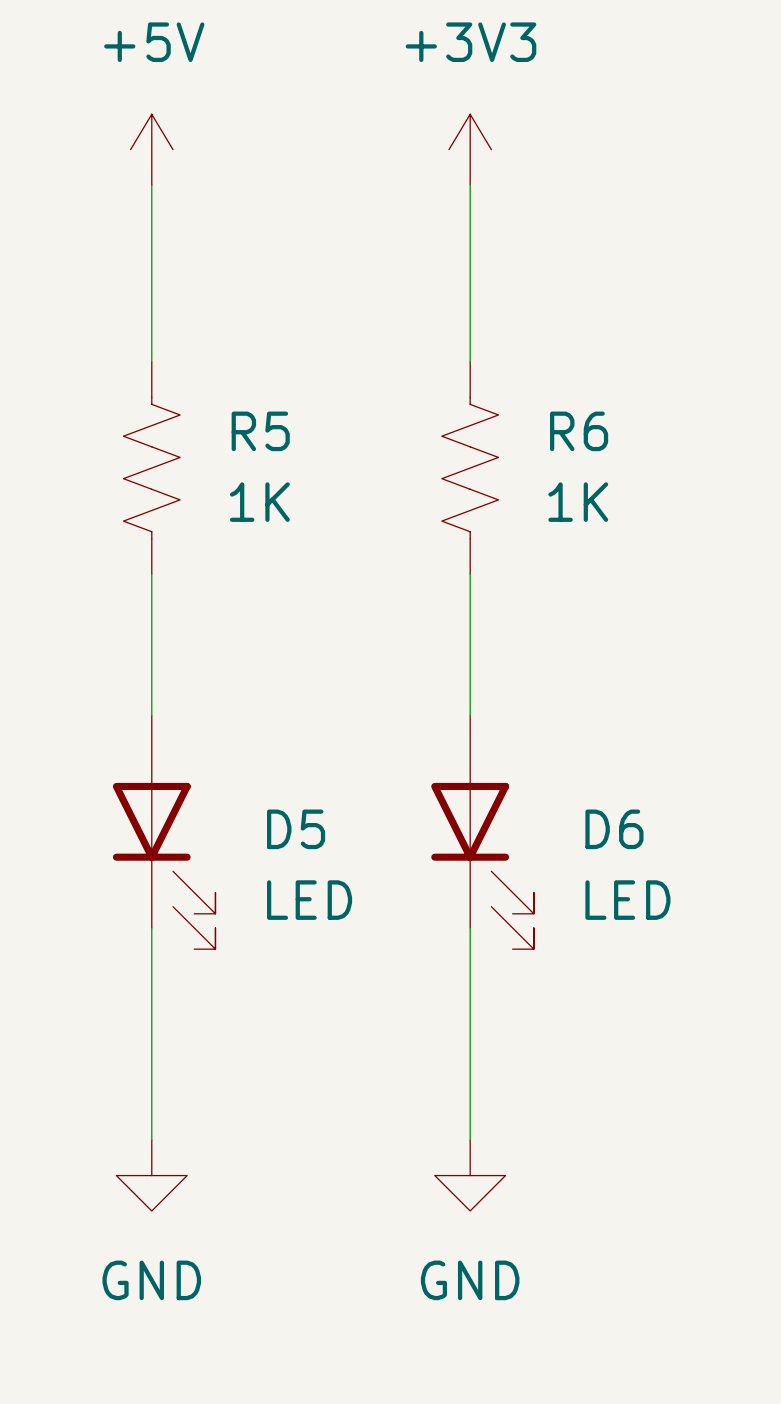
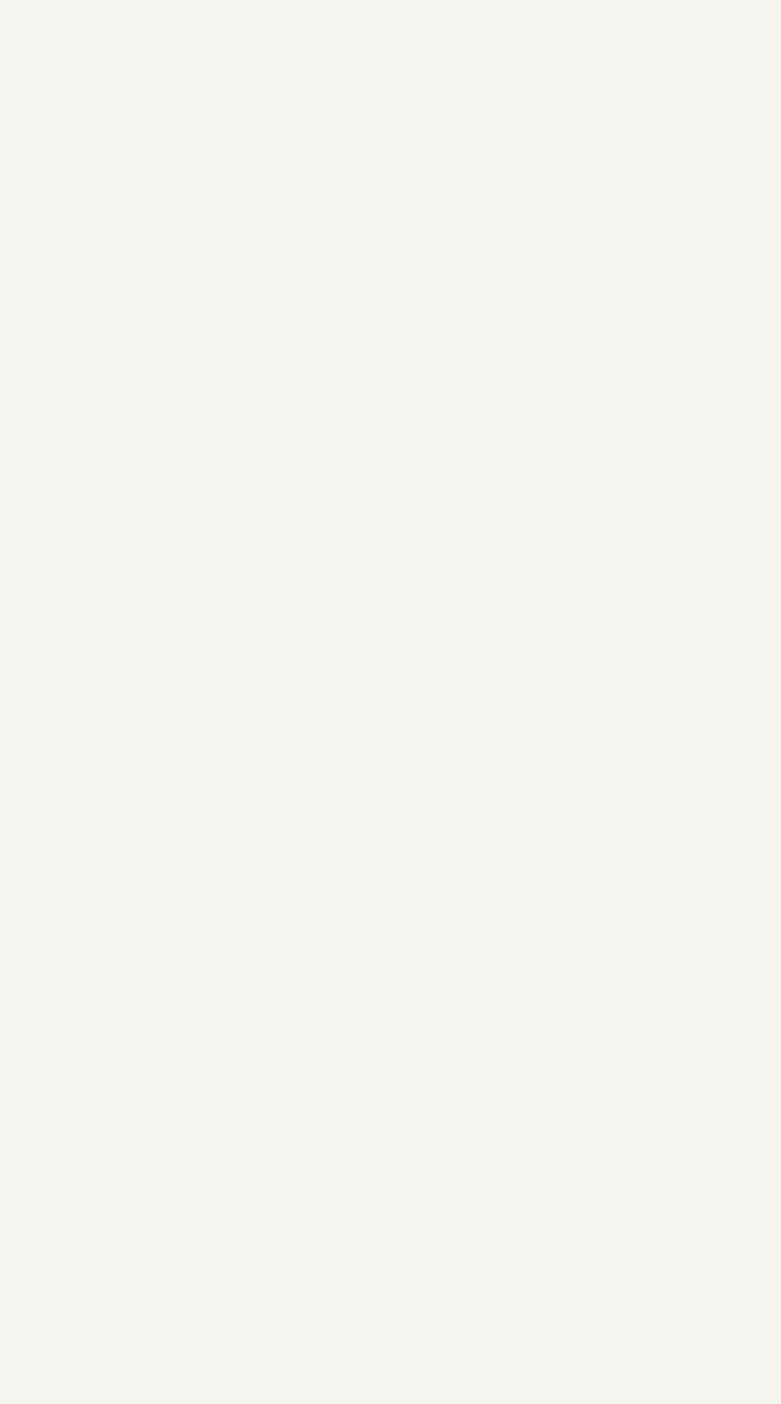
power symbol: +5V (151, 149) -> none
power symbol: +3V3 (470, 149) -> none
wire: (151, 185) (151, 361) -> none
wire: (470, 185) (470, 361) -> none
R5: 1K (151, 468) -> none
R6: 1K (470, 468) -> none
wire: (151, 574) (151, 715) -> none
wire: (470, 574) (470, 715) -> none
D5: LED (164, 832) -> none
D6: LED (482, 832) -> none
wire: (151, 927) (151, 1140) -> none
wire: (470, 927) (470, 1140) -> none
power symbol: GND (151, 1175) -> none
power symbol: GND (470, 1175) -> none

